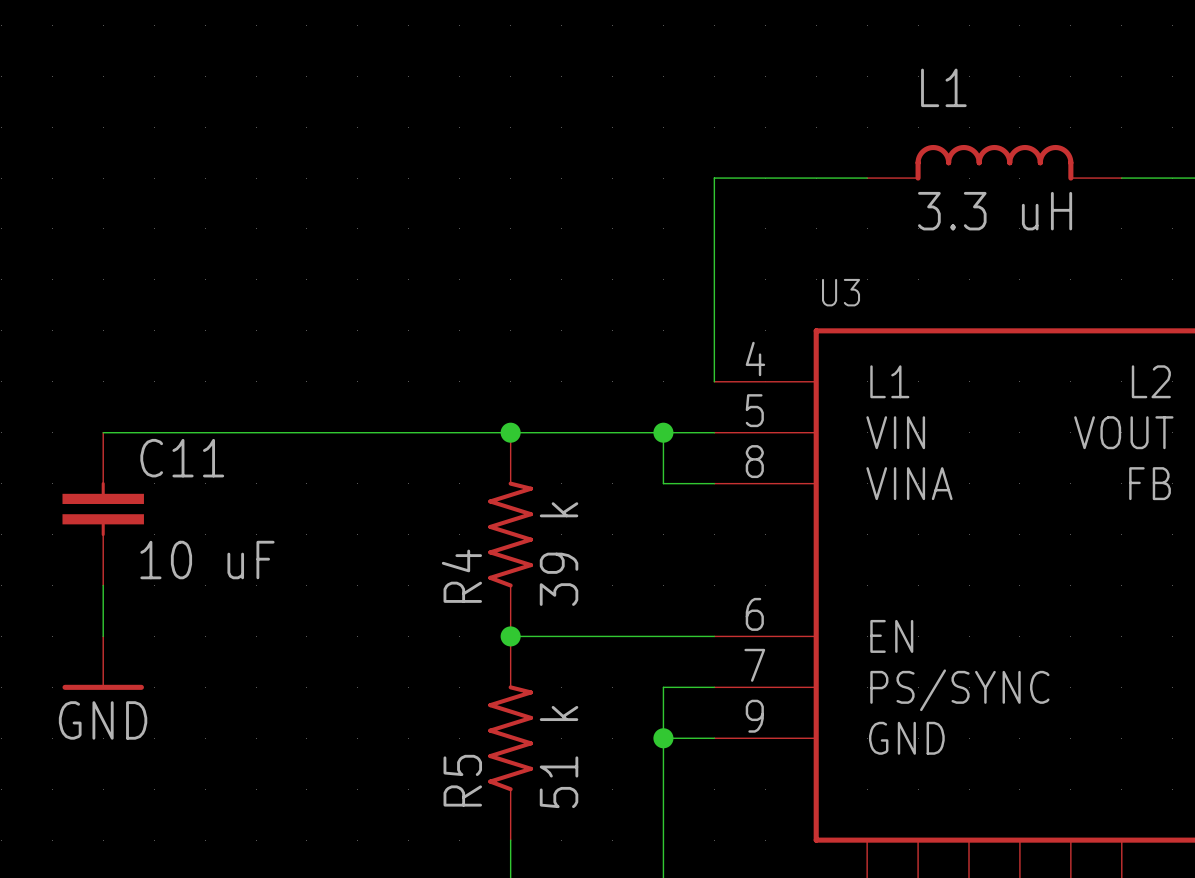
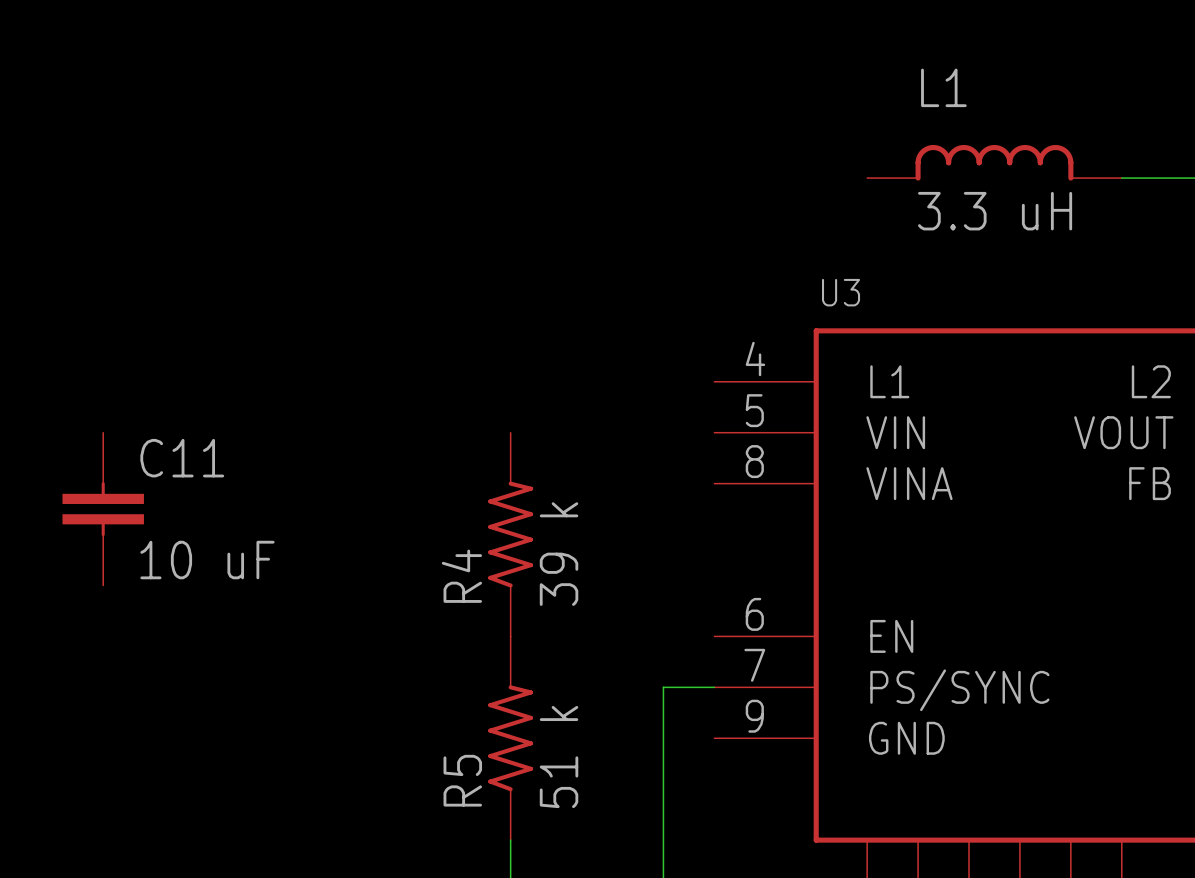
wire: (867, 178) (714, 178) (714, 381) -> none
wire: (103, 432) (714, 432) -> none
junction: (510, 432) -> none
wire: (663, 432) (663, 483) (714, 483) -> none
junction: (663, 432) -> none
wire: (103, 585) (103, 636) -> none
wire: (510, 636) (714, 636) -> none
junction: (510, 636) -> none
power symbol: GND (103, 663) -> none
wire: (663, 738) (714, 738) -> none
junction: (663, 738) -> none

